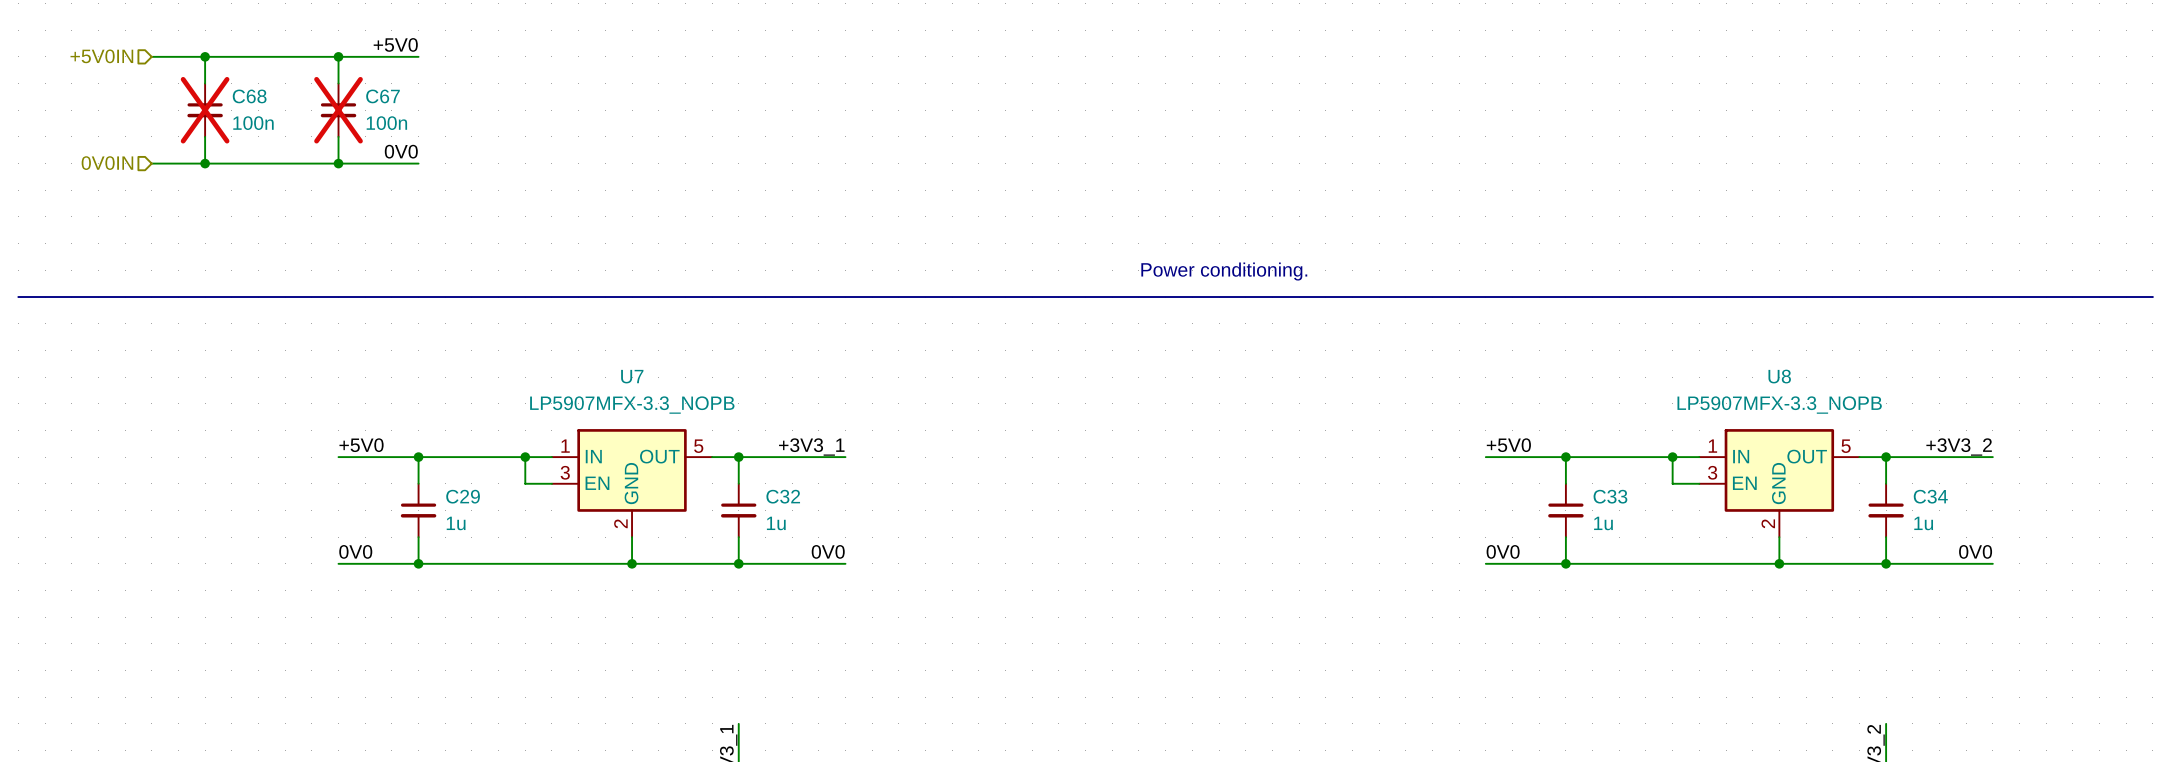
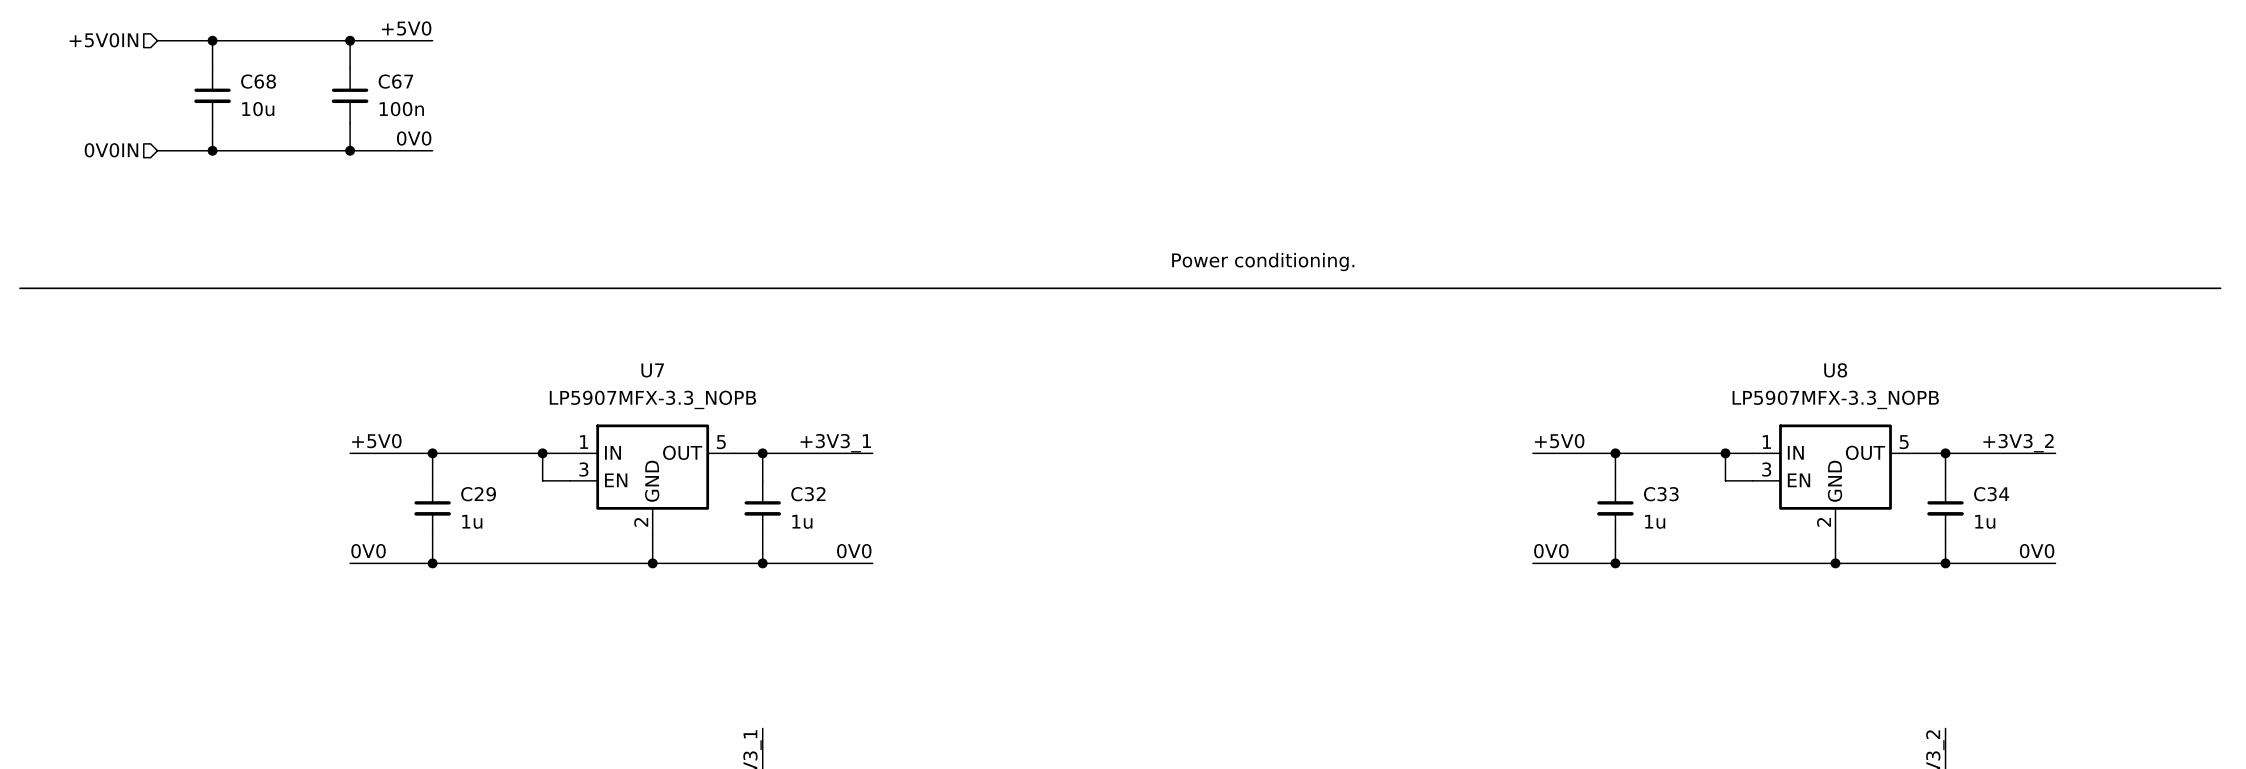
C68 do-not-place cross: (205, 110) -> none
C67 do-not-place cross: (338, 110) -> none
C68 value: 100n (253, 123) -> 10u (258, 109)

